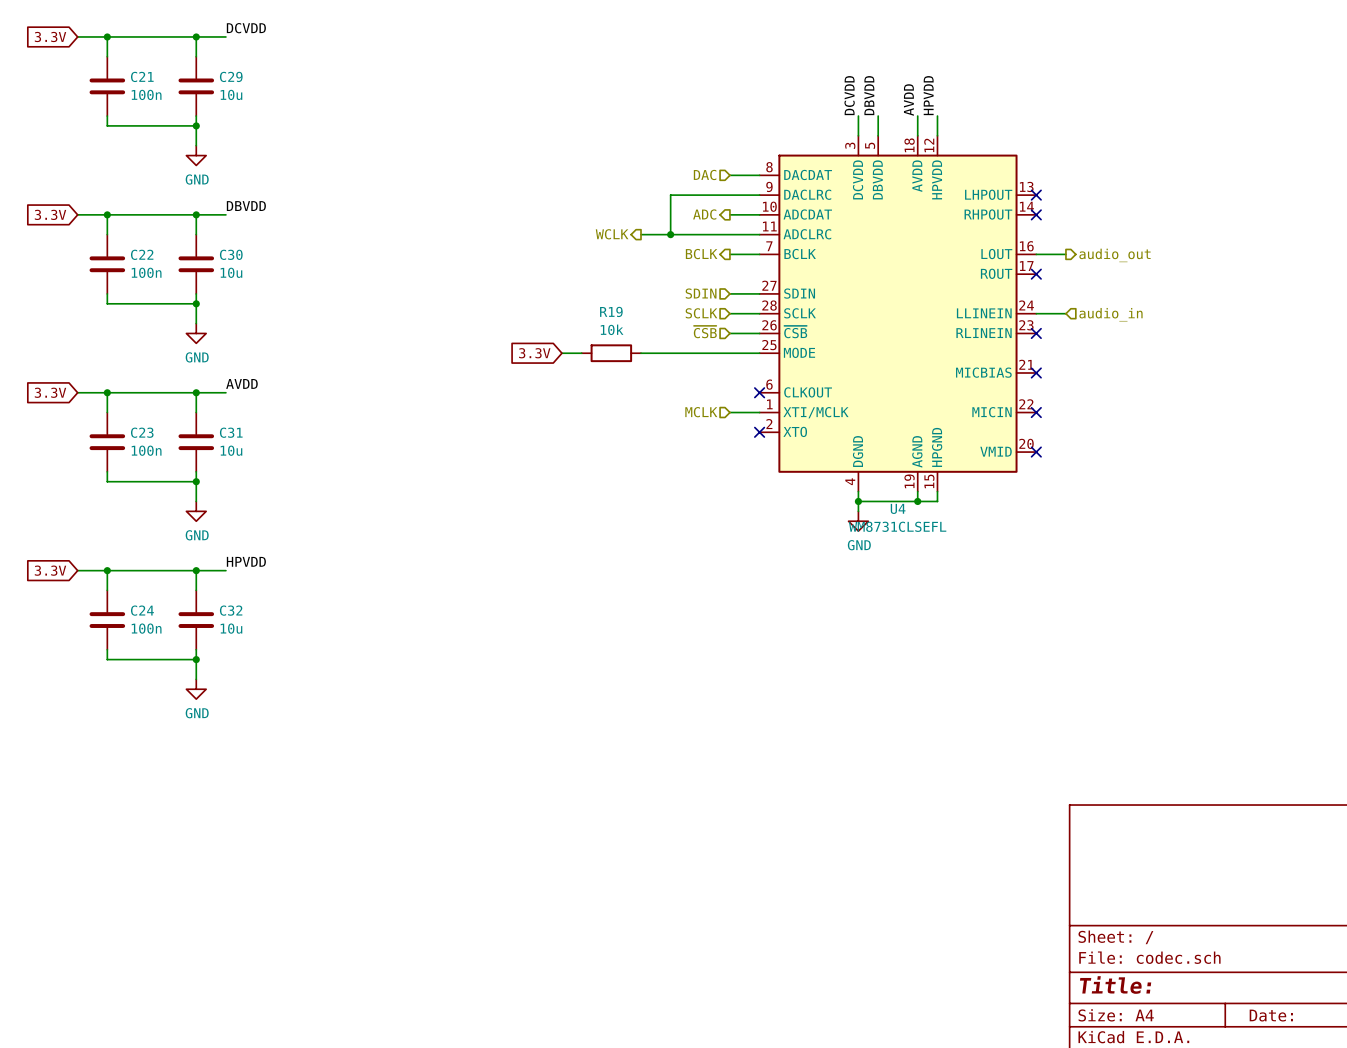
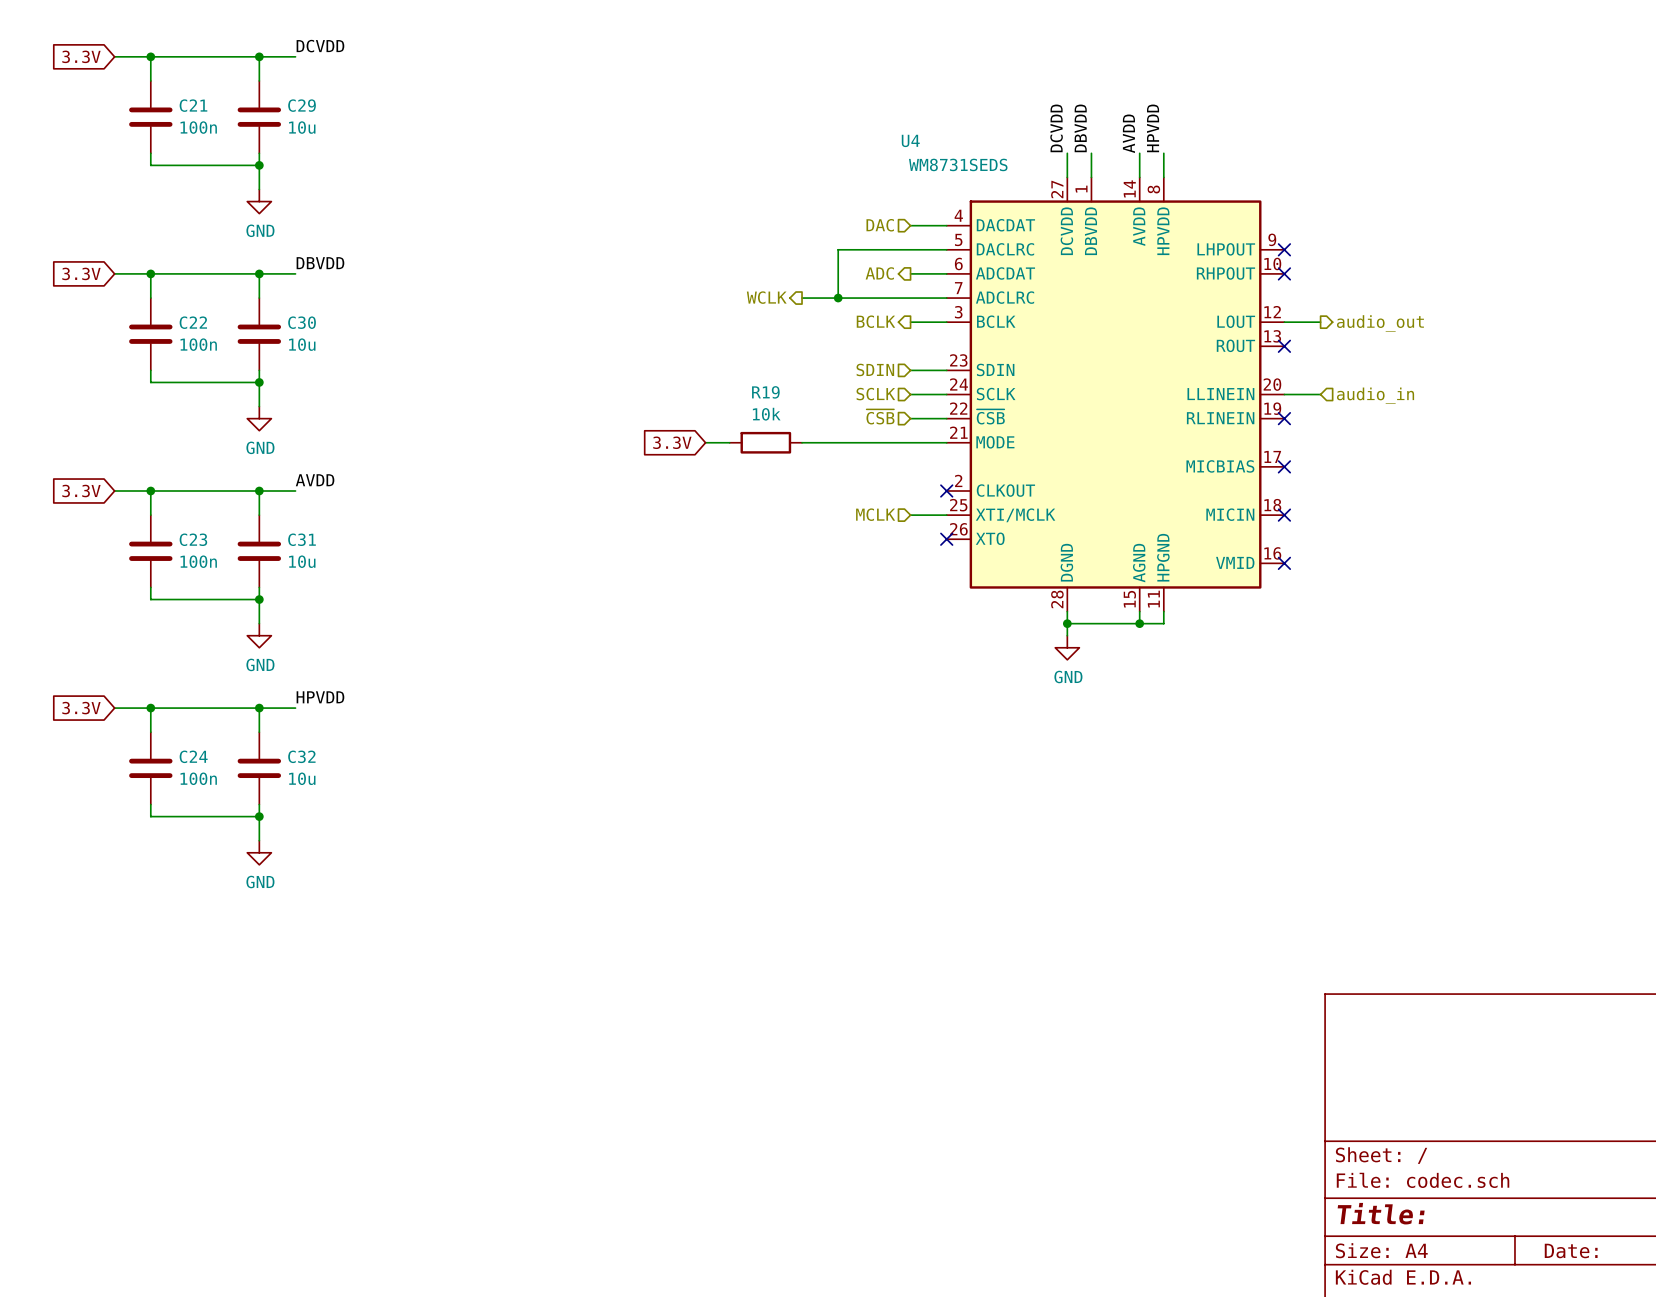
U4 symbol: [759, 135, 1037, 492] -> [946, 177, 1285, 612]
U4 name position: U4 (898, 508) -> U4 (910, 140)
U4 value: WM8731CLSEFL (897, 526) -> WM8731SEDS (958, 164)

